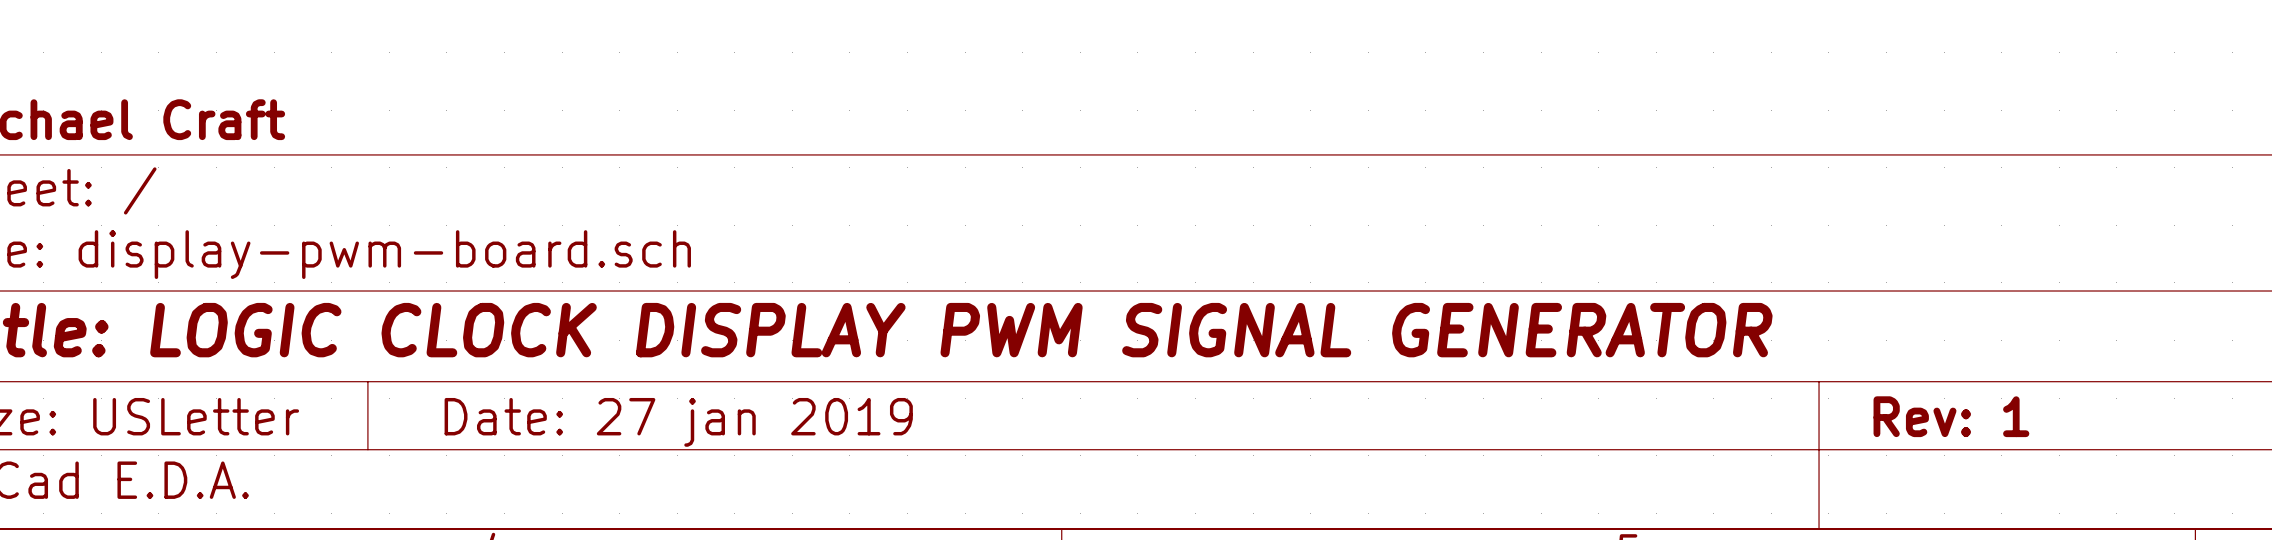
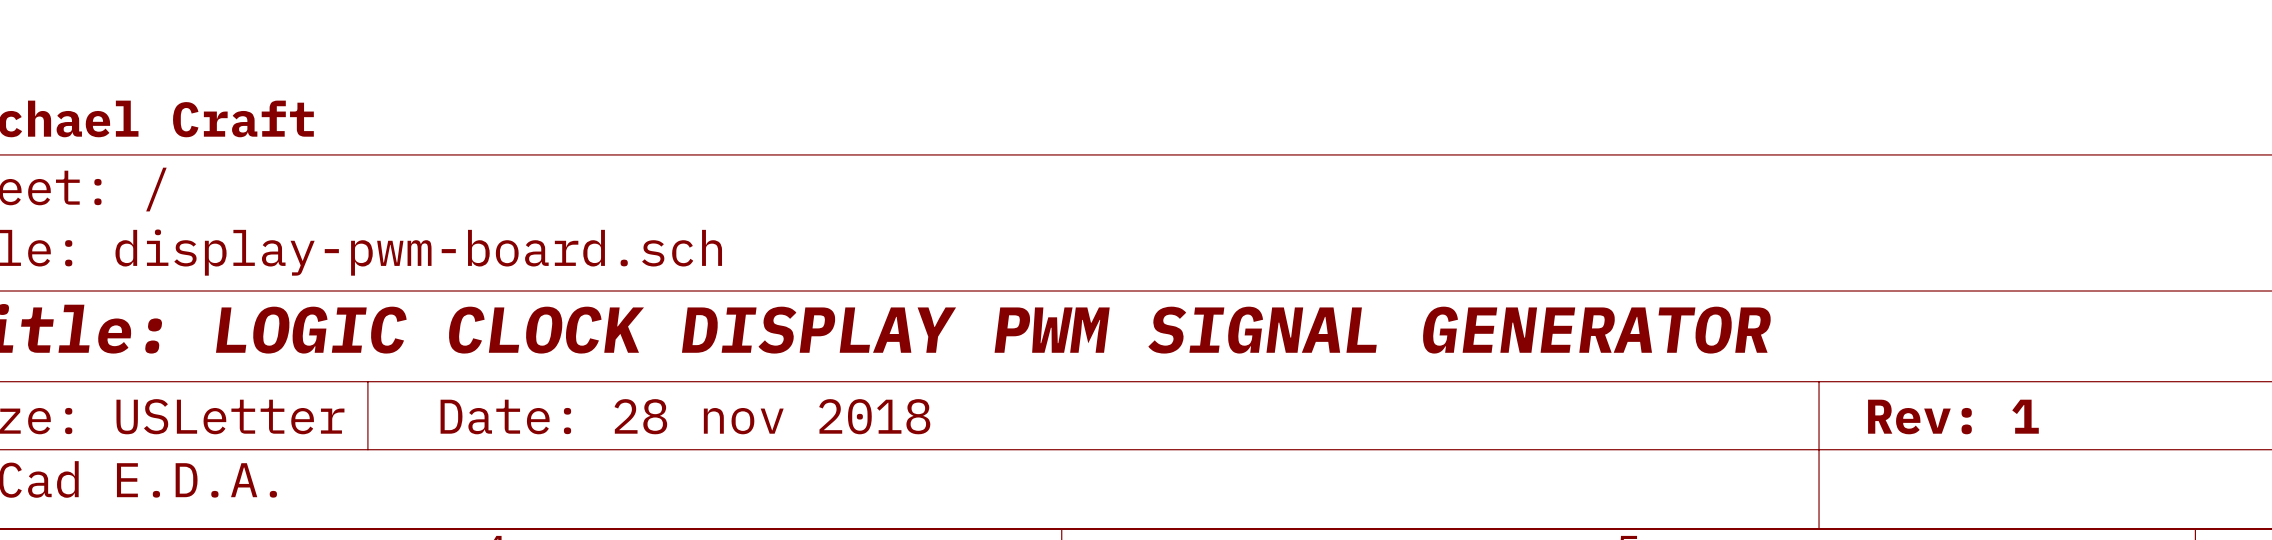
title block: Date: 27 jan 2019 (678, 422) -> Date: 28 nov 2018 (685, 416)

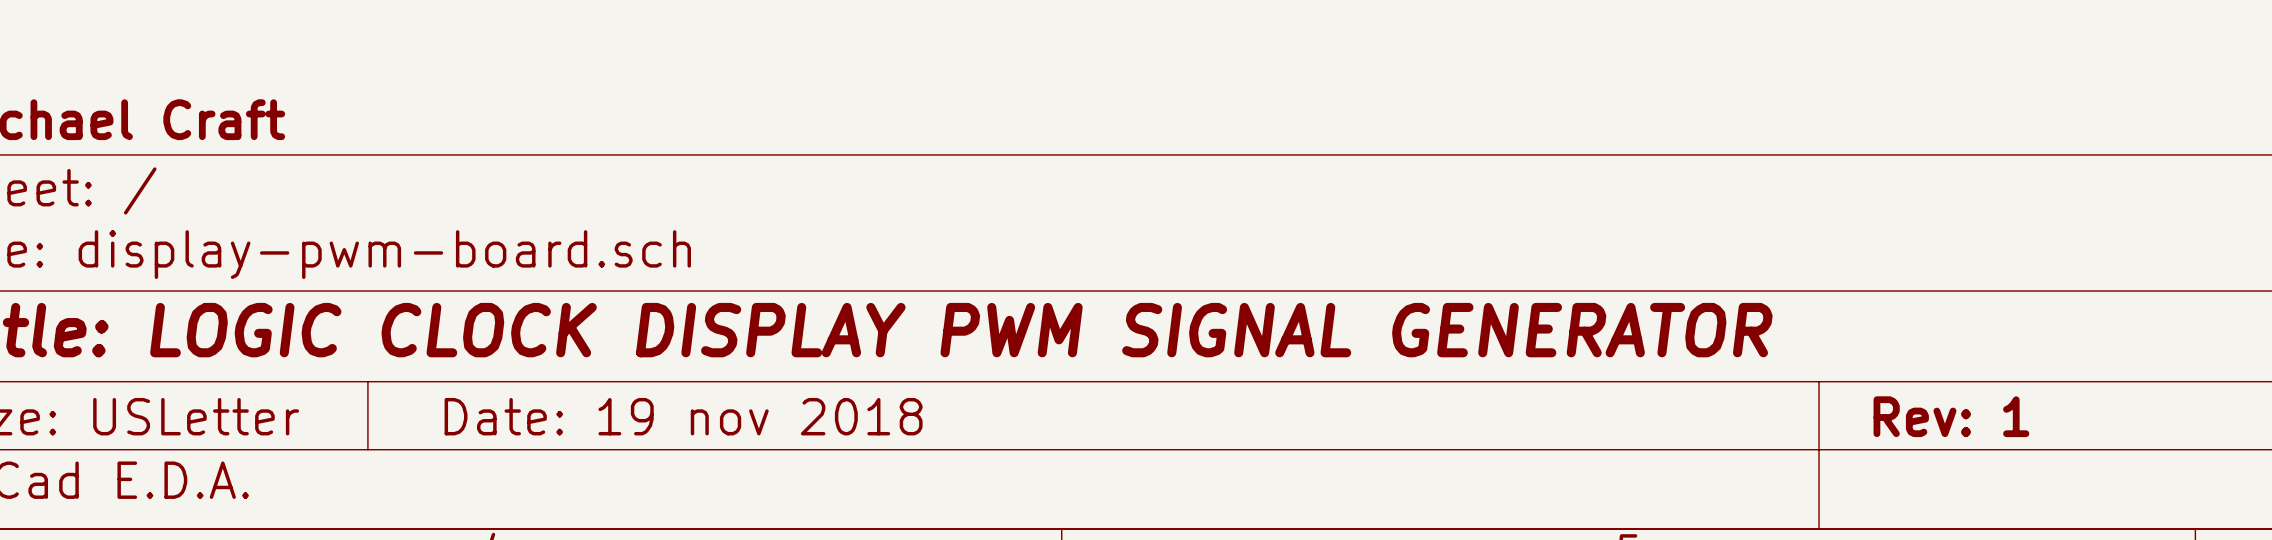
title block: Date: 28 nov 2018 (685, 416) -> Date: 19 nov 2018 (683, 416)

